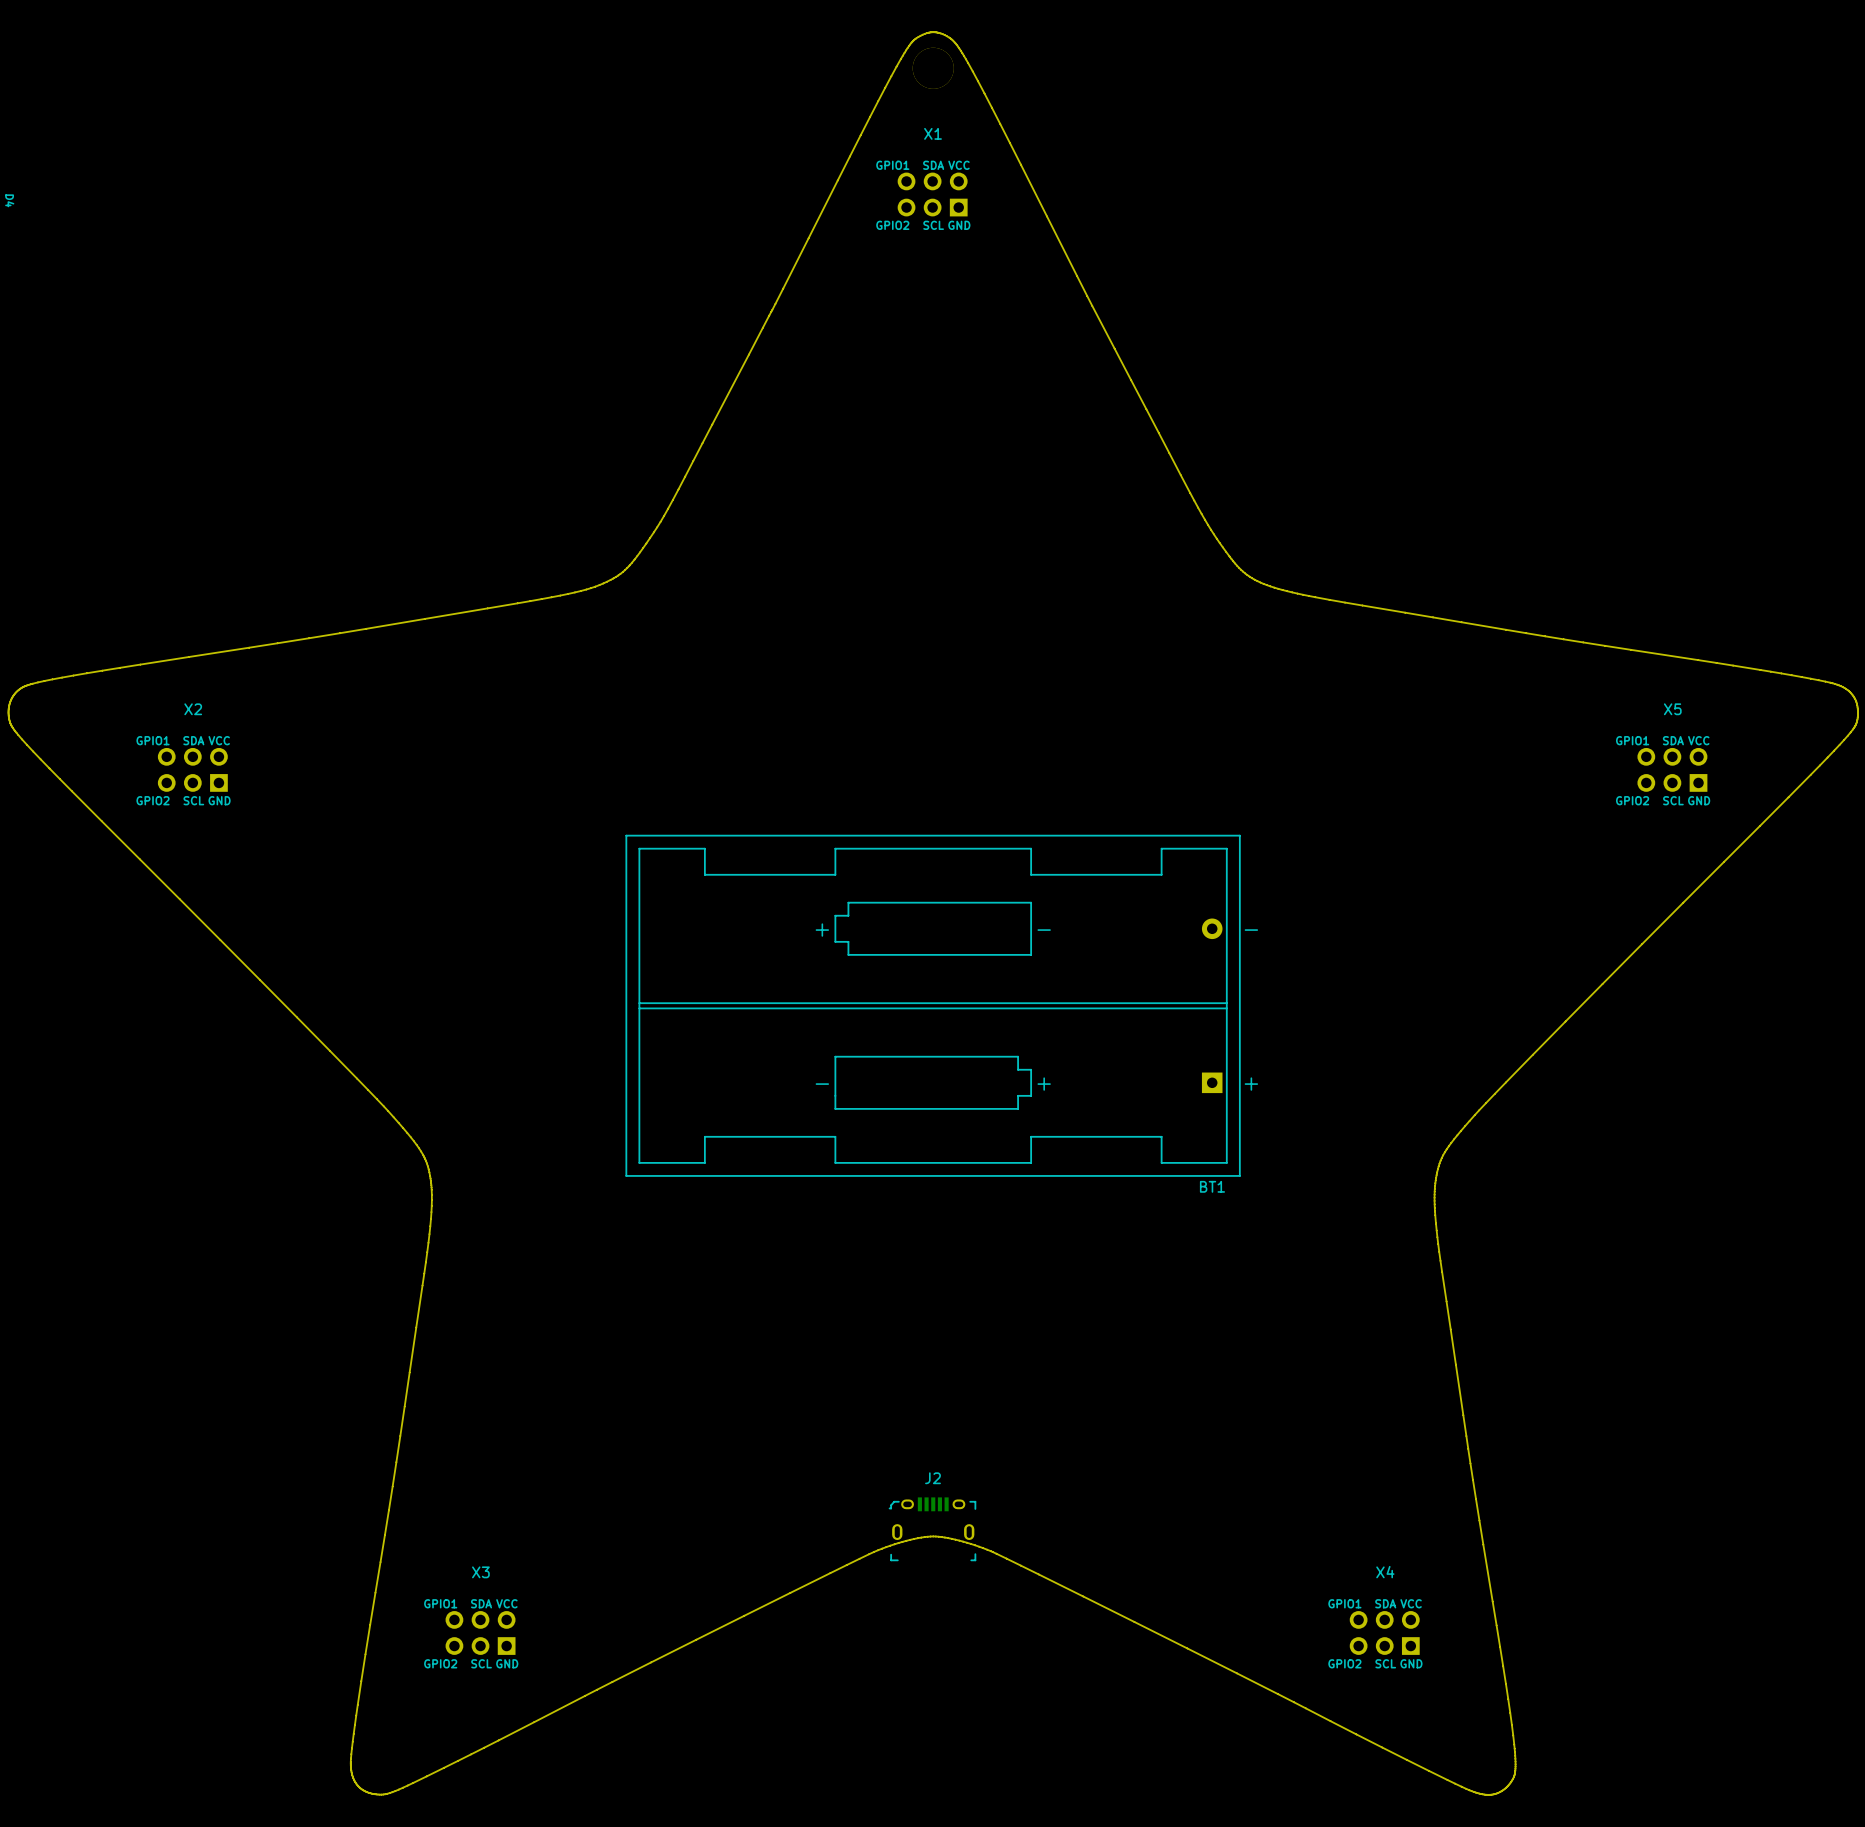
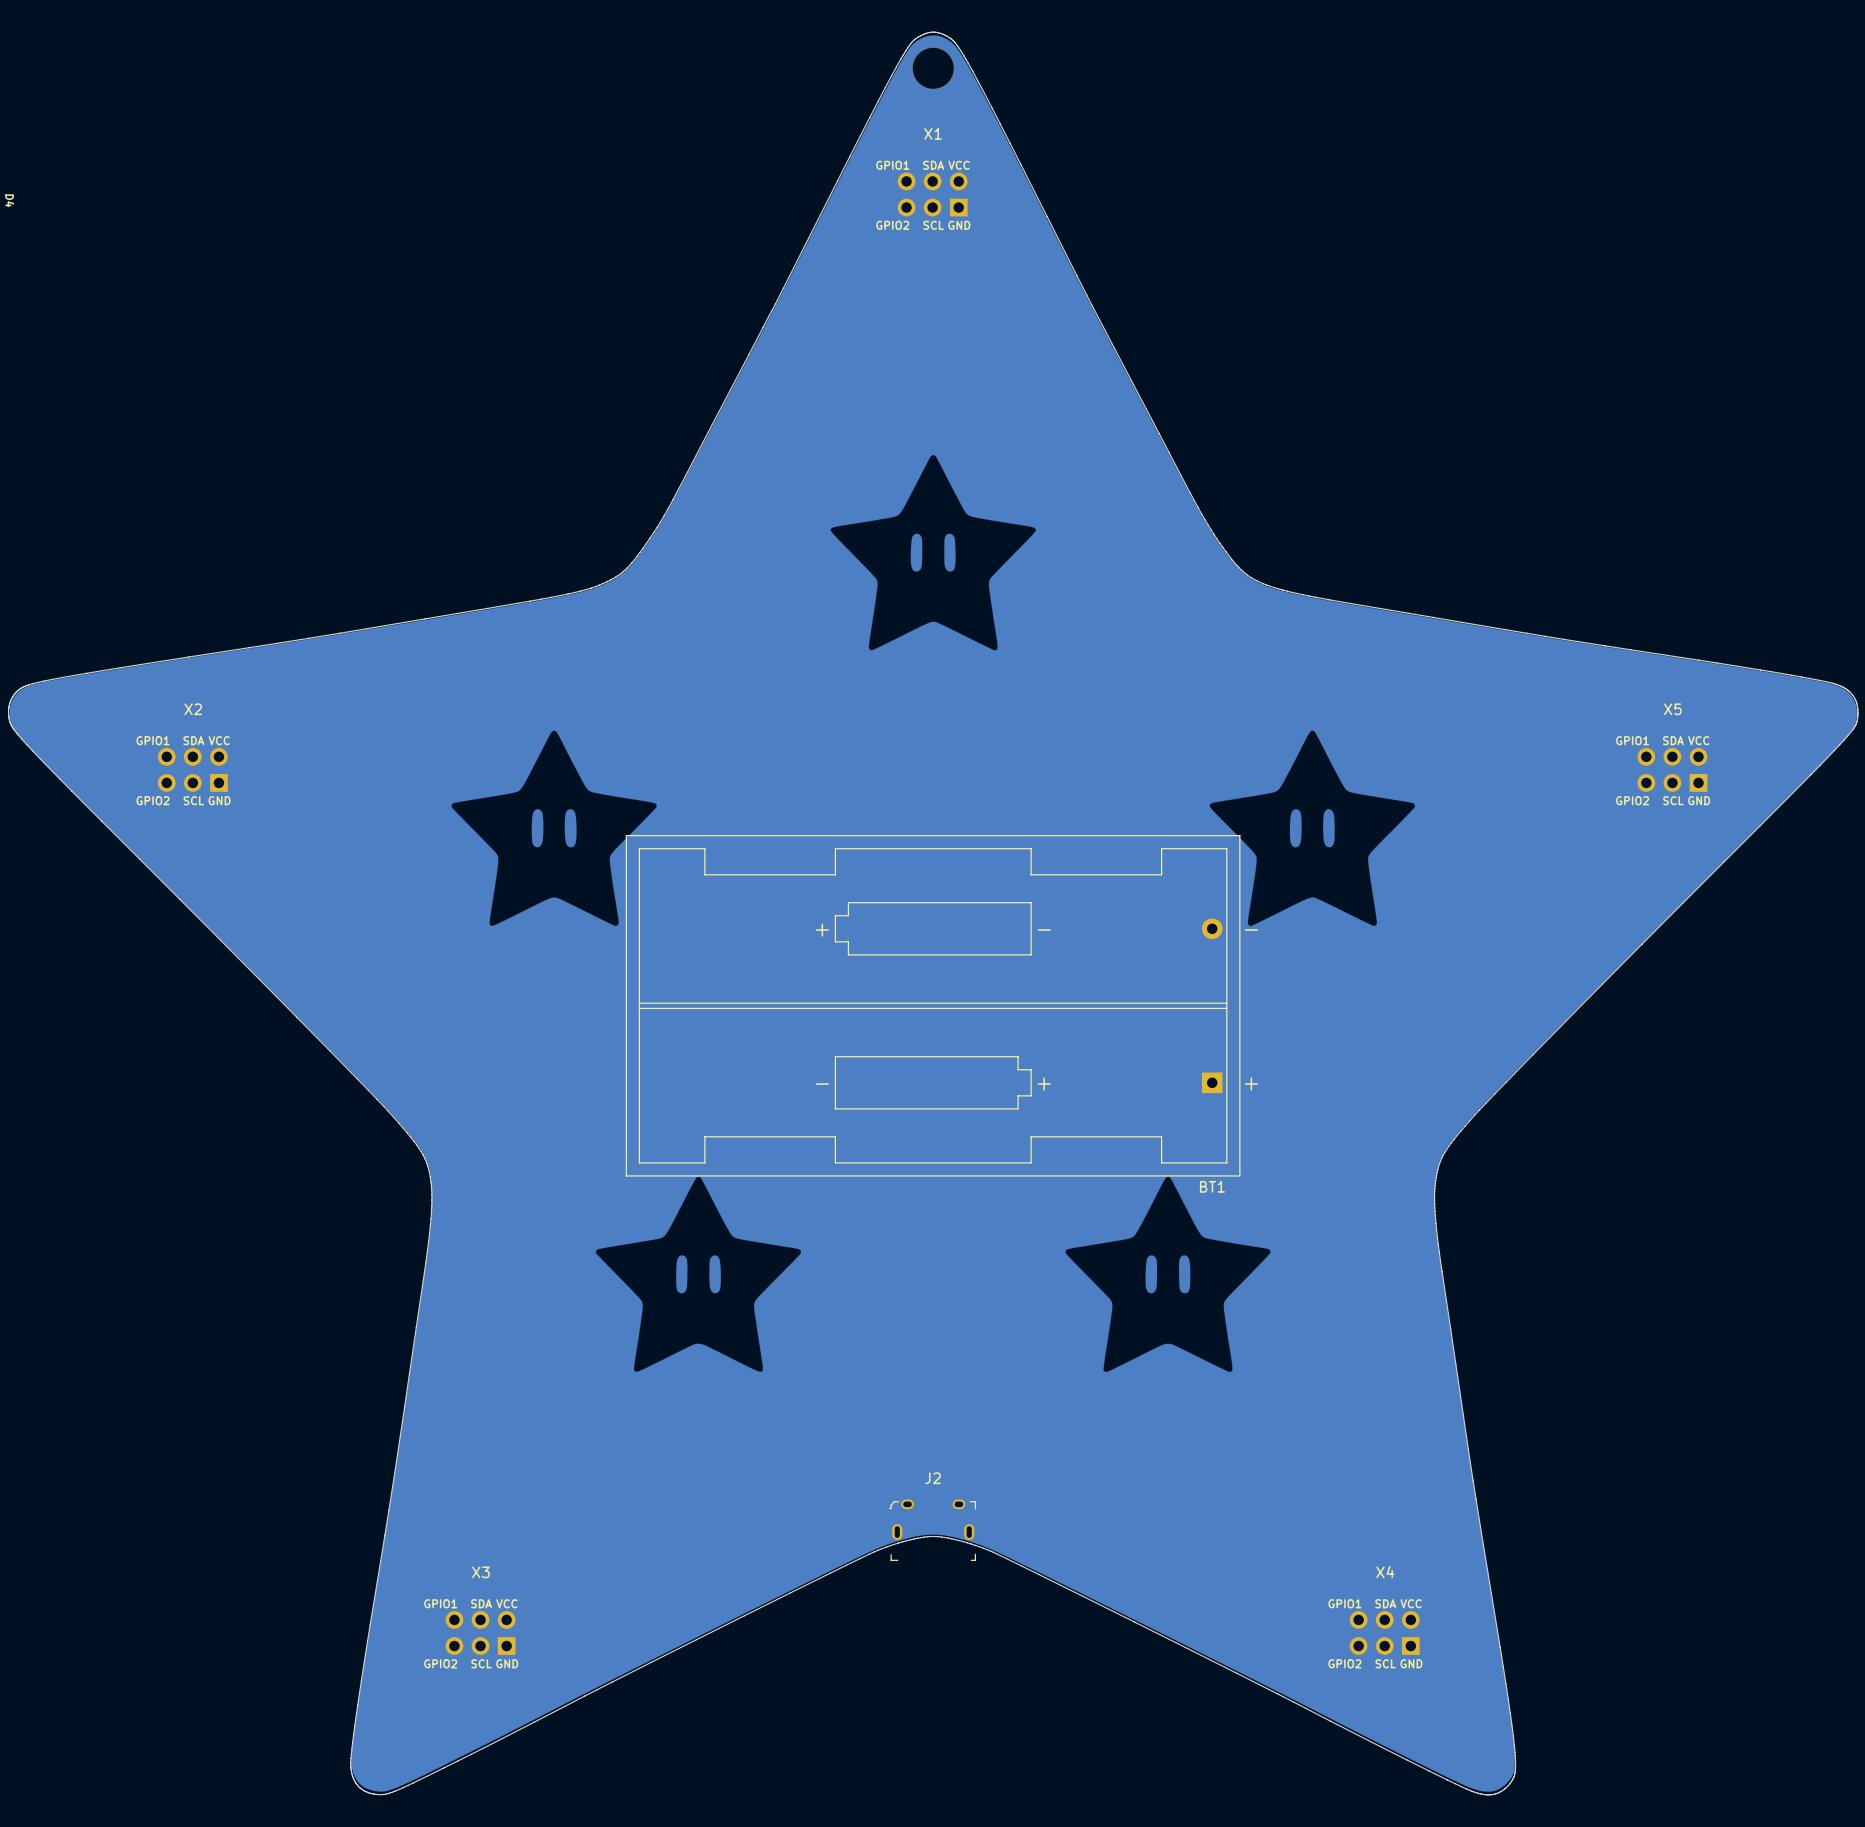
drawing: none -> [9, 35, 1858, 1792]

